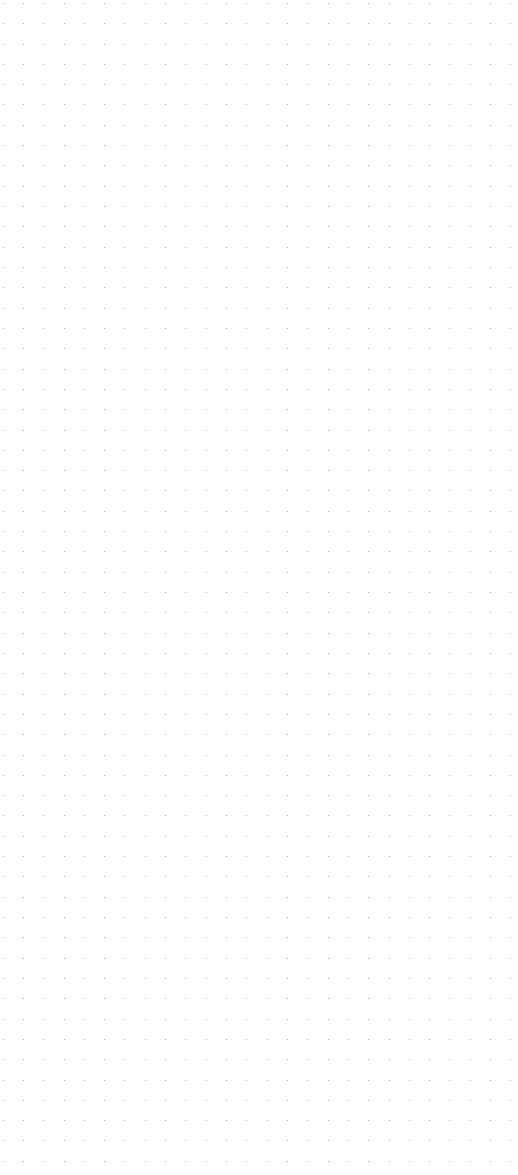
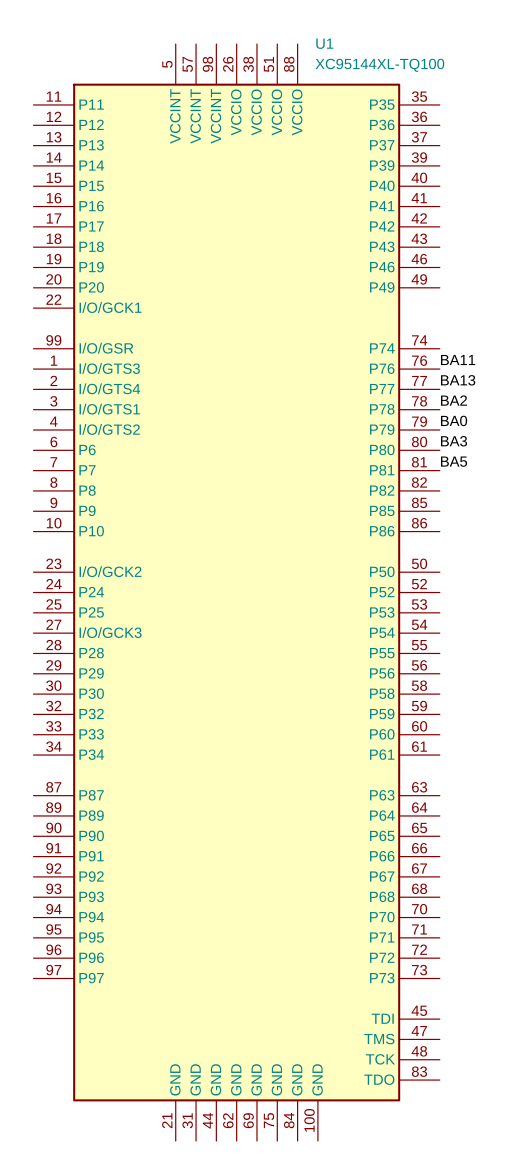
label: none -> BA11 (458, 360)
label: none -> BA13 (458, 380)
label: none -> BA2 (453, 400)
label: none -> BA0 (454, 420)
label: none -> BA3 (454, 441)
label: none -> BA5 (454, 461)
U1: none -> XC95144XL-TQ100 (236, 592)

